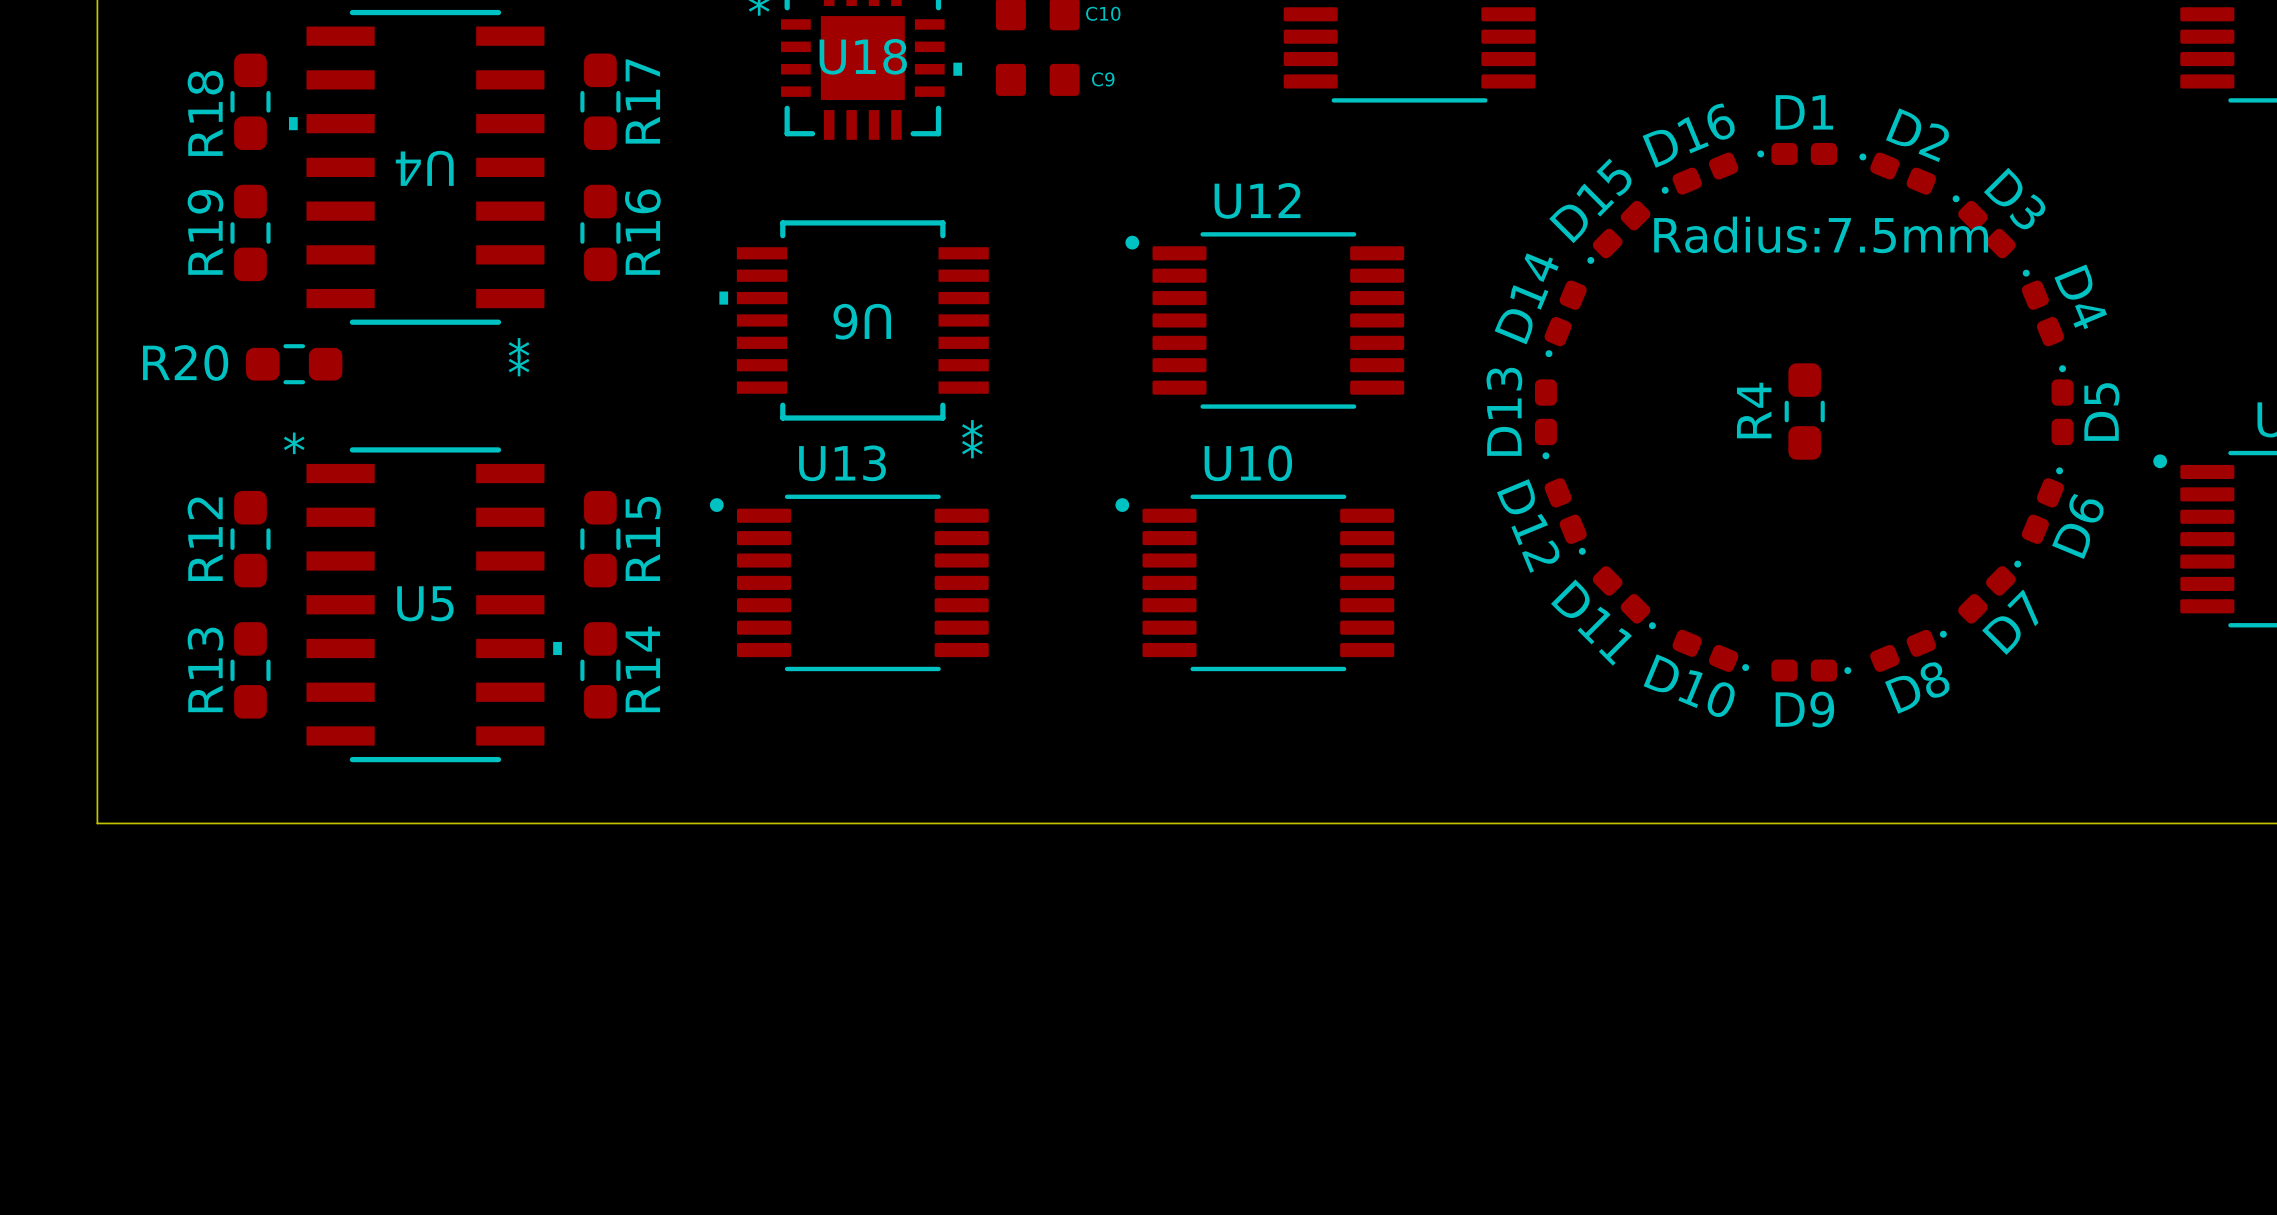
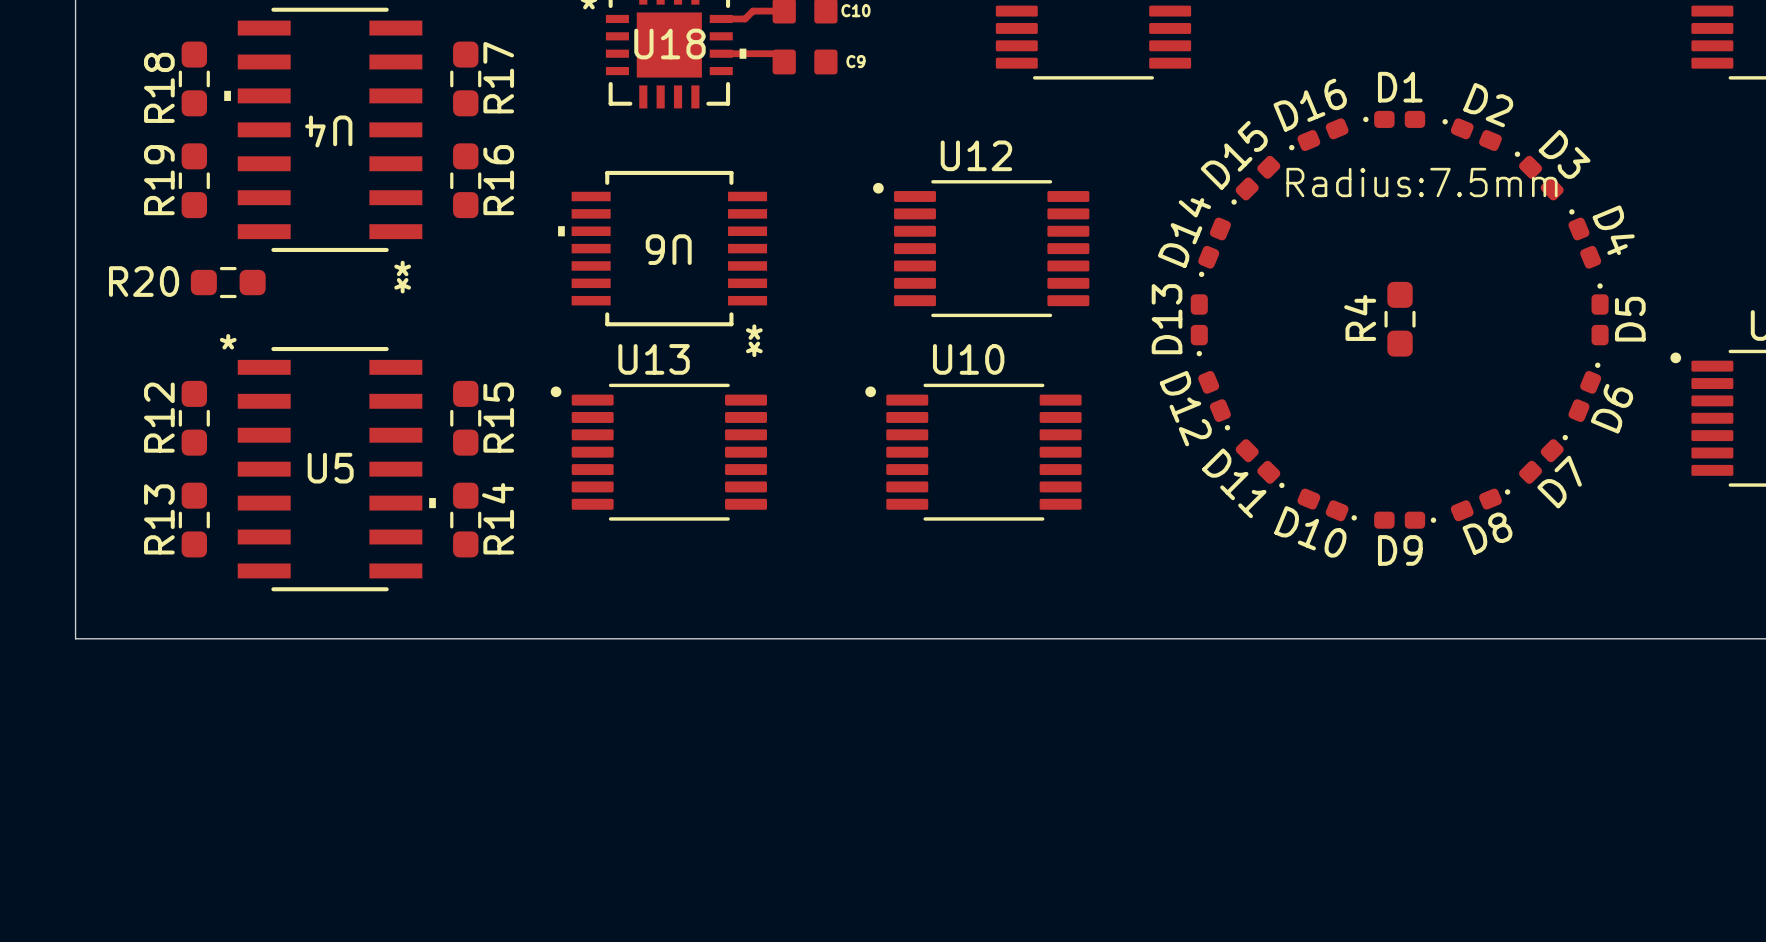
track: none -> (784, 11) (752, 11) (745, 18) (721, 18)
track: none -> (721, 53) (775, 53) (784, 61)

